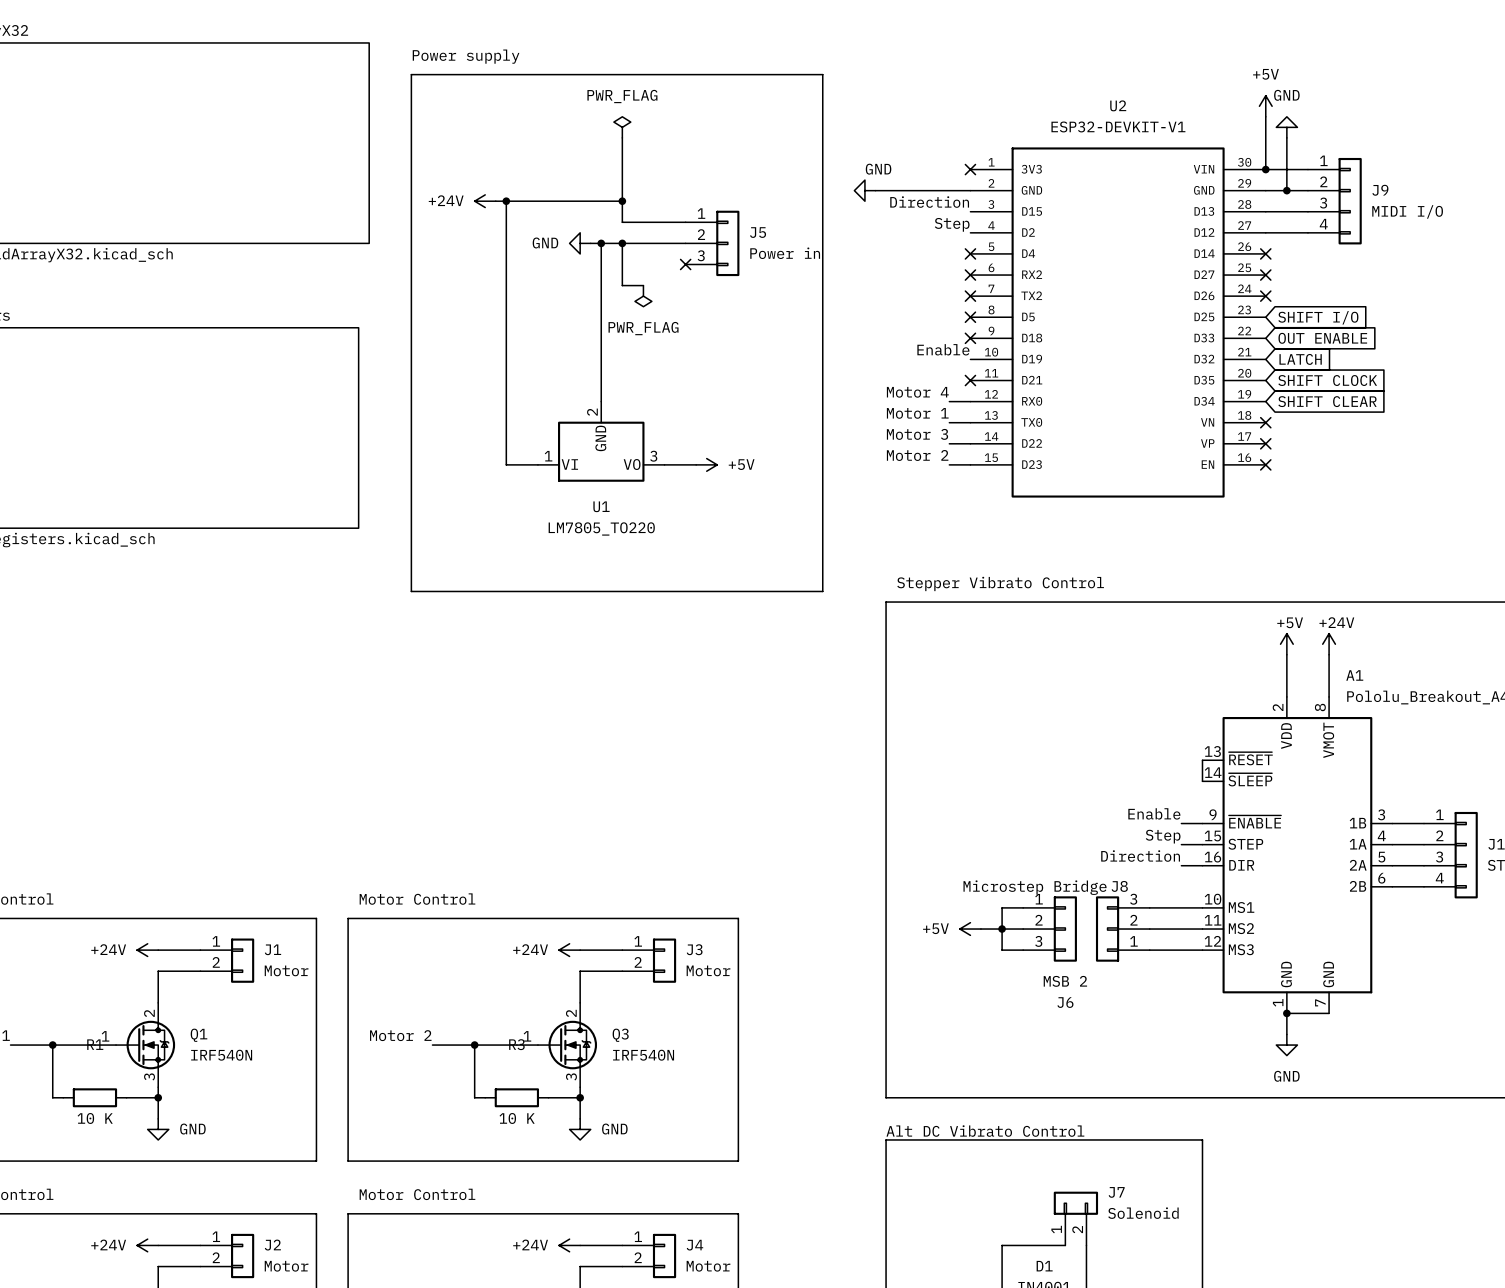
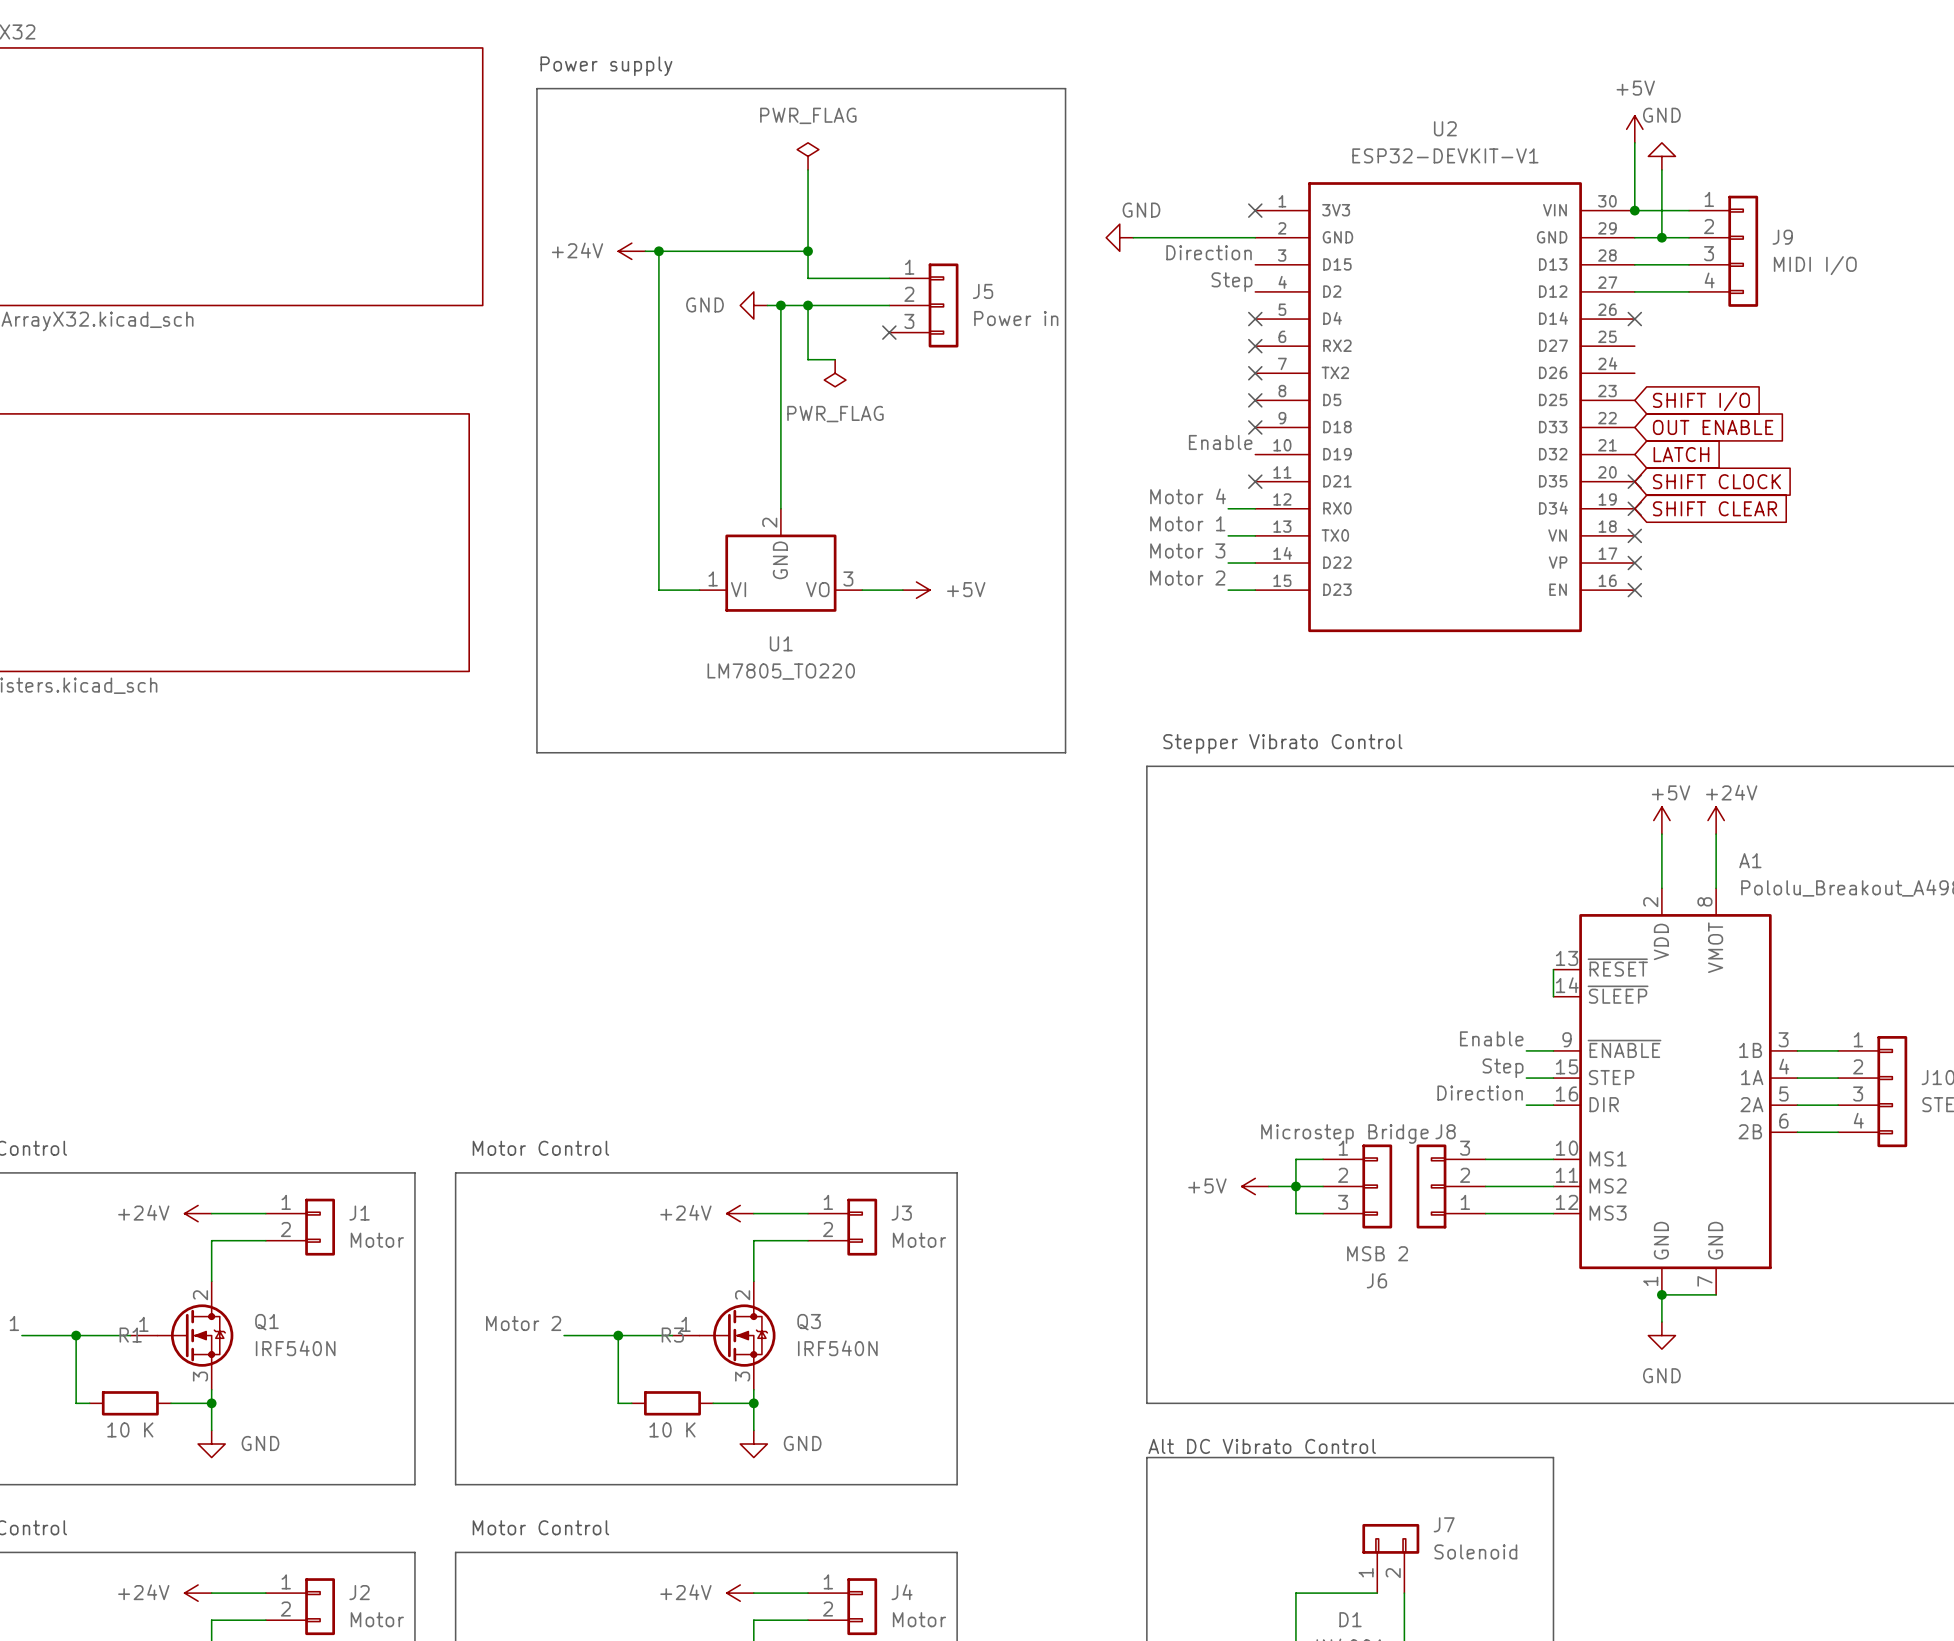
no-connect mark: (1265, 275) -> none
no-connect mark: (1265, 296) -> none
no-connect mark: none -> (1634, 481)
no-connect mark: none -> (1634, 508)

